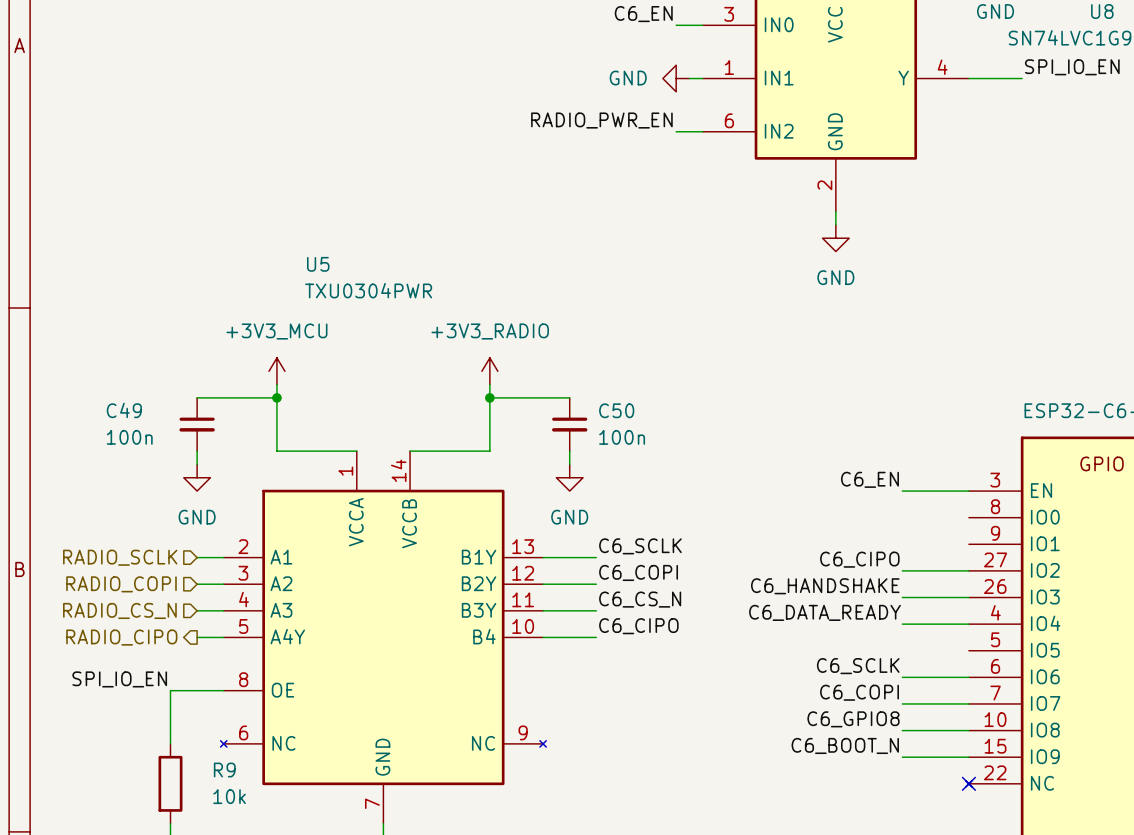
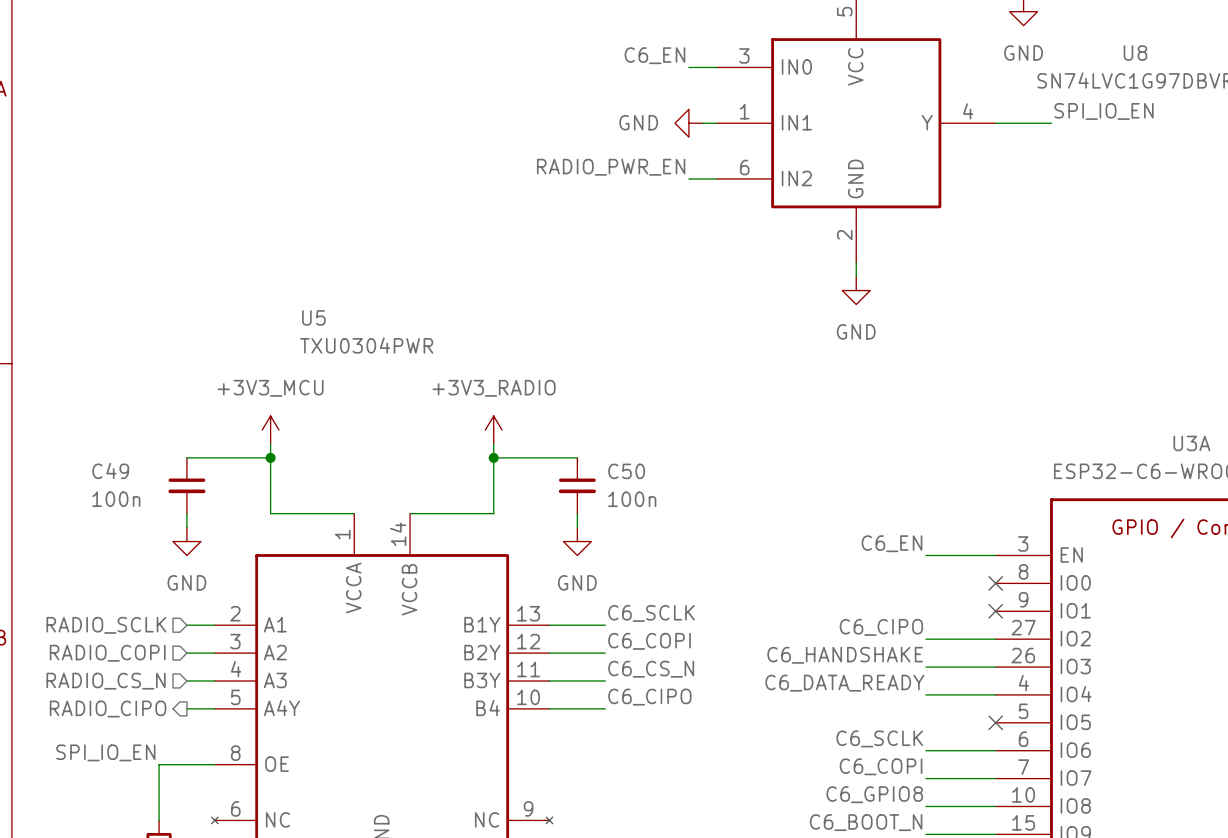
no-connect mark: none -> (995, 583)
no-connect mark: none -> (995, 611)
no-connect mark: none -> (995, 722)

